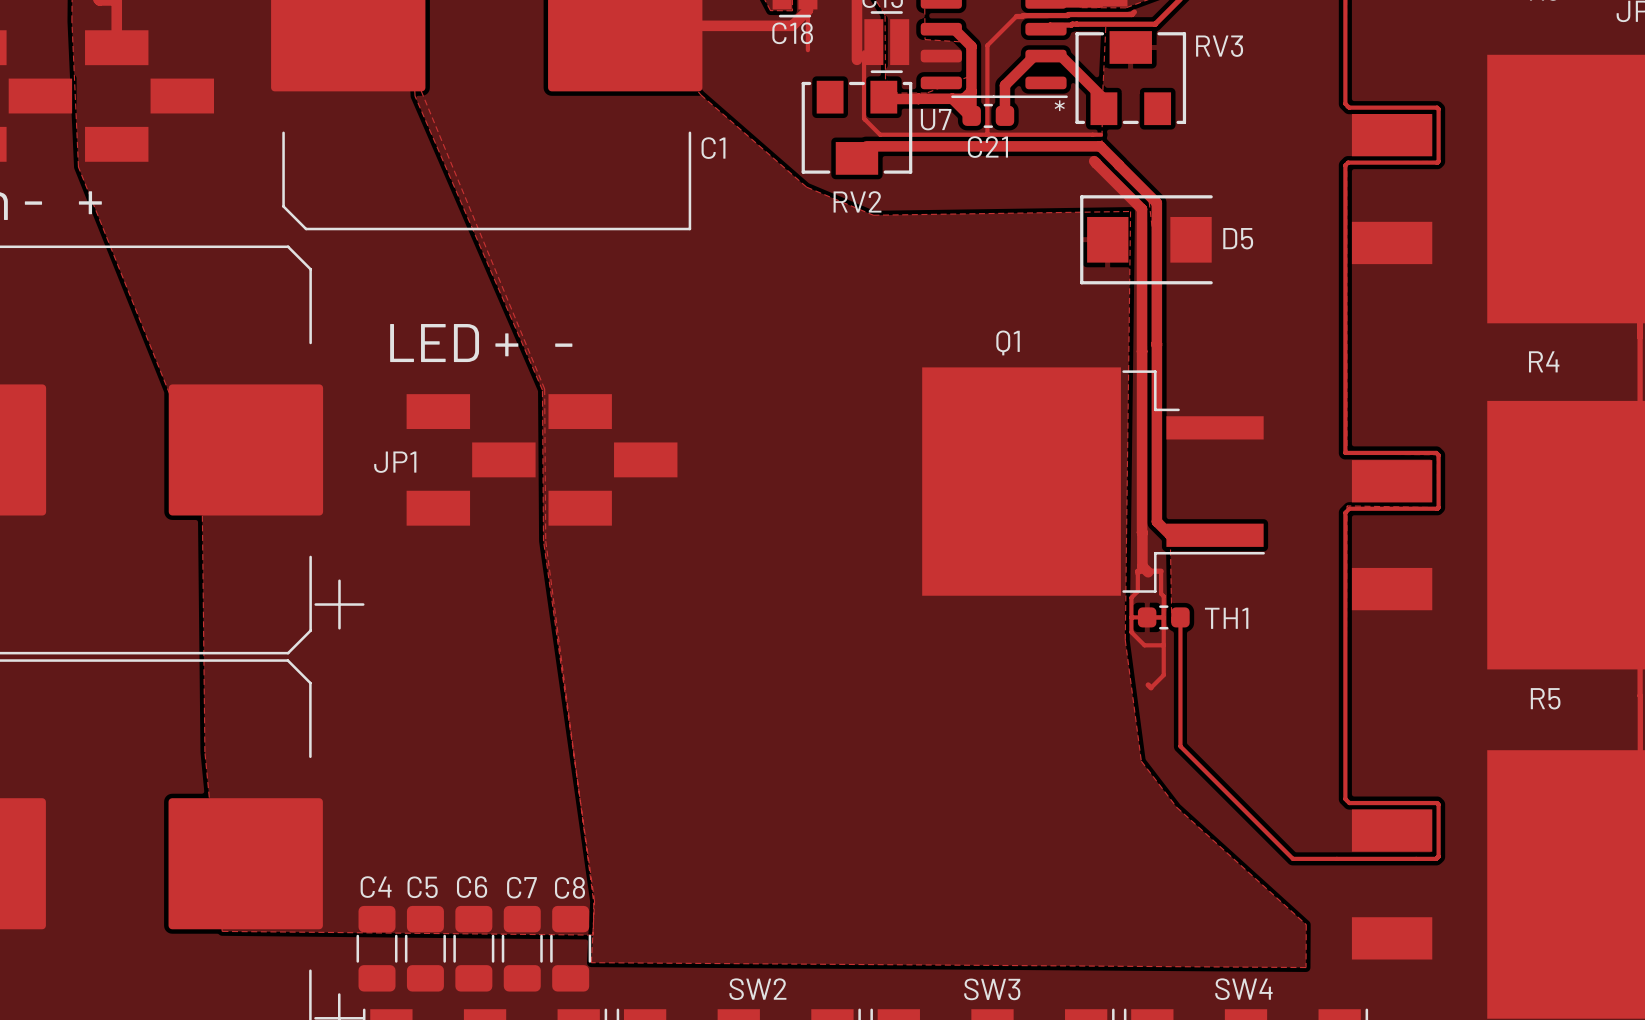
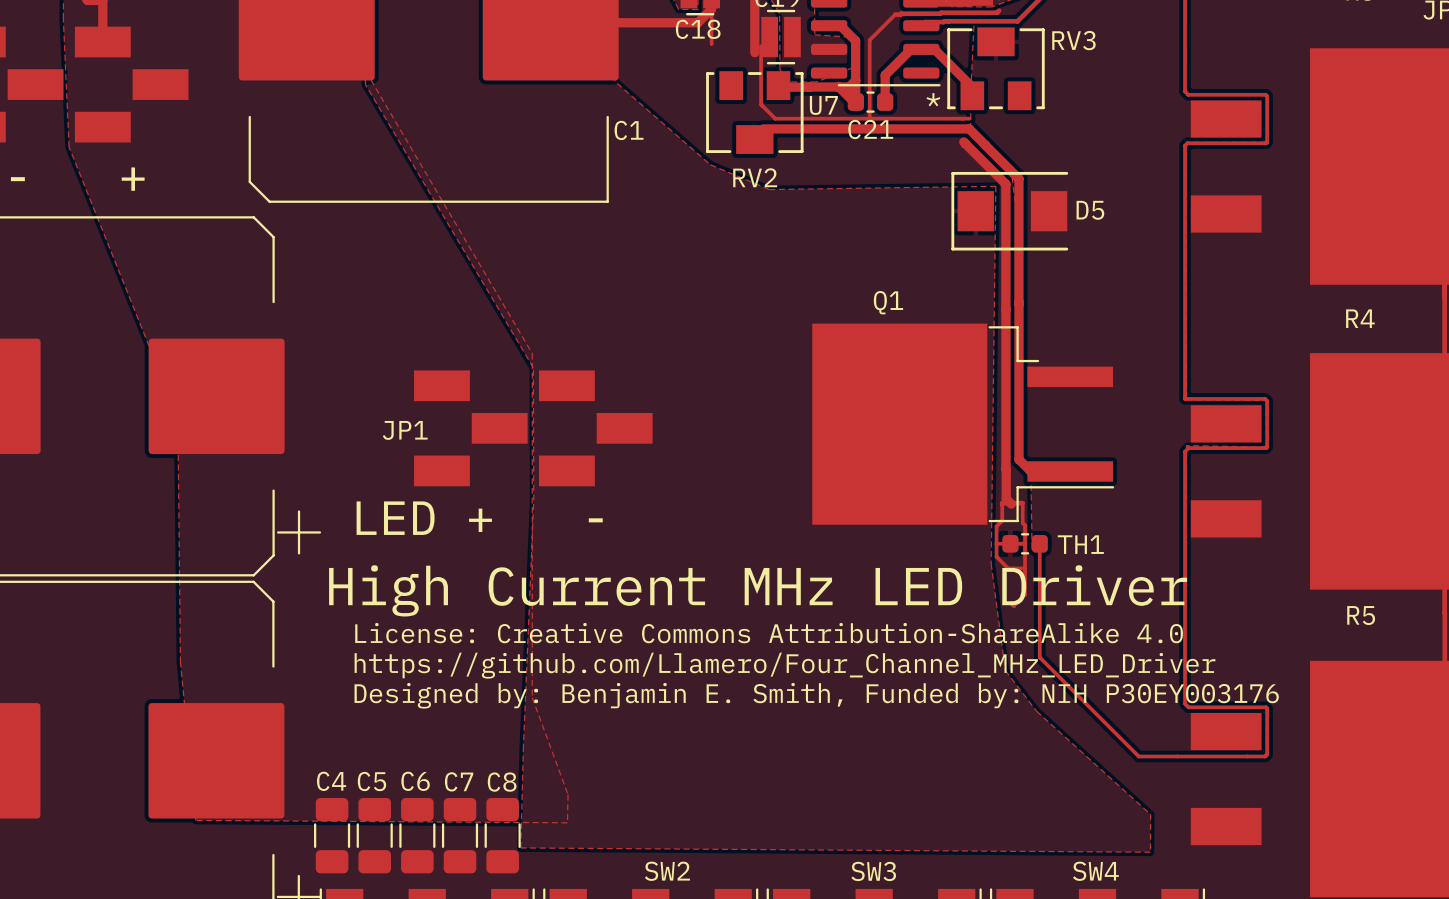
zone outline: (421, 90) (544, 389) (545, 541) (593, 903) (593, 935) (222, 931) -> (370, 80) (532, 353) (532, 697) (568, 794) (567, 822) (195, 820)
zone outline: (415, 96) (542, 390) (543, 541) (594, 901) (591, 962) -> (365, 84) (533, 367) (533, 500) (520, 847)
text position: LED + - (481, 343) -> LED + - (479, 518)
JP1 position: (542, 459) -> (533, 428)
text: none -> High Current MHz LED Driver (758, 590)
text: none -> License: Creative Commons Attribution-ShareAlike 4.0 (769, 633)
text: none -> https://github.com/Llamero/Four_Channel_MHz_LED_Driver (785, 665)
text: none -> Designed by: Benjamin E. Smith, Funded by: NIH P30EY003176 (816, 695)

